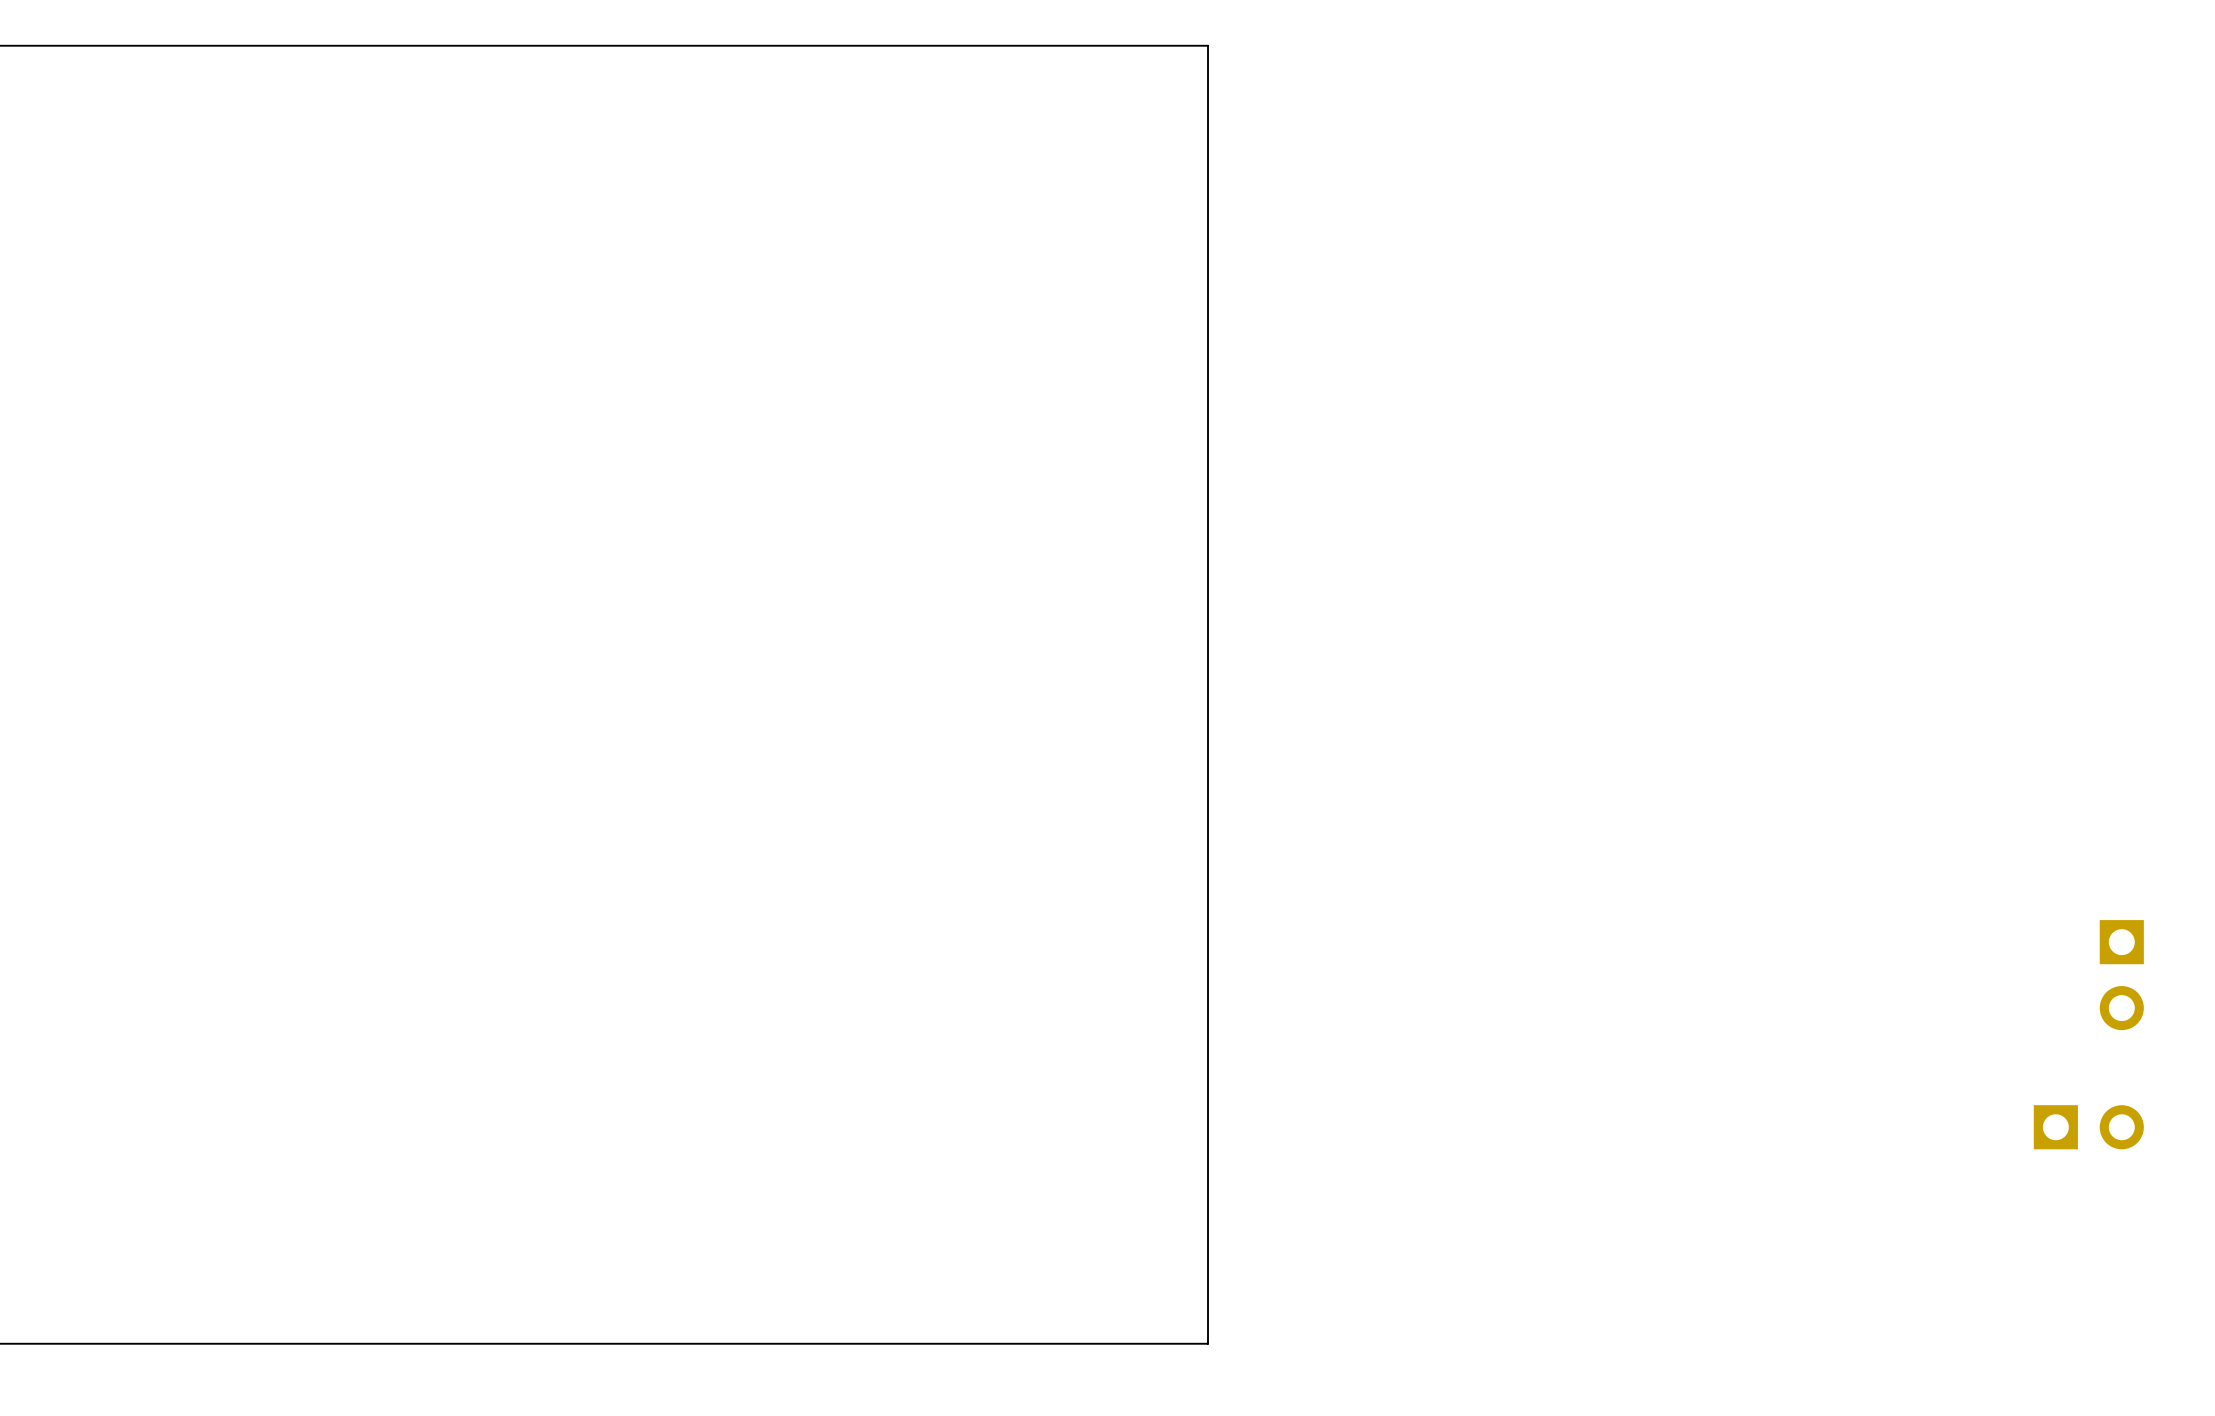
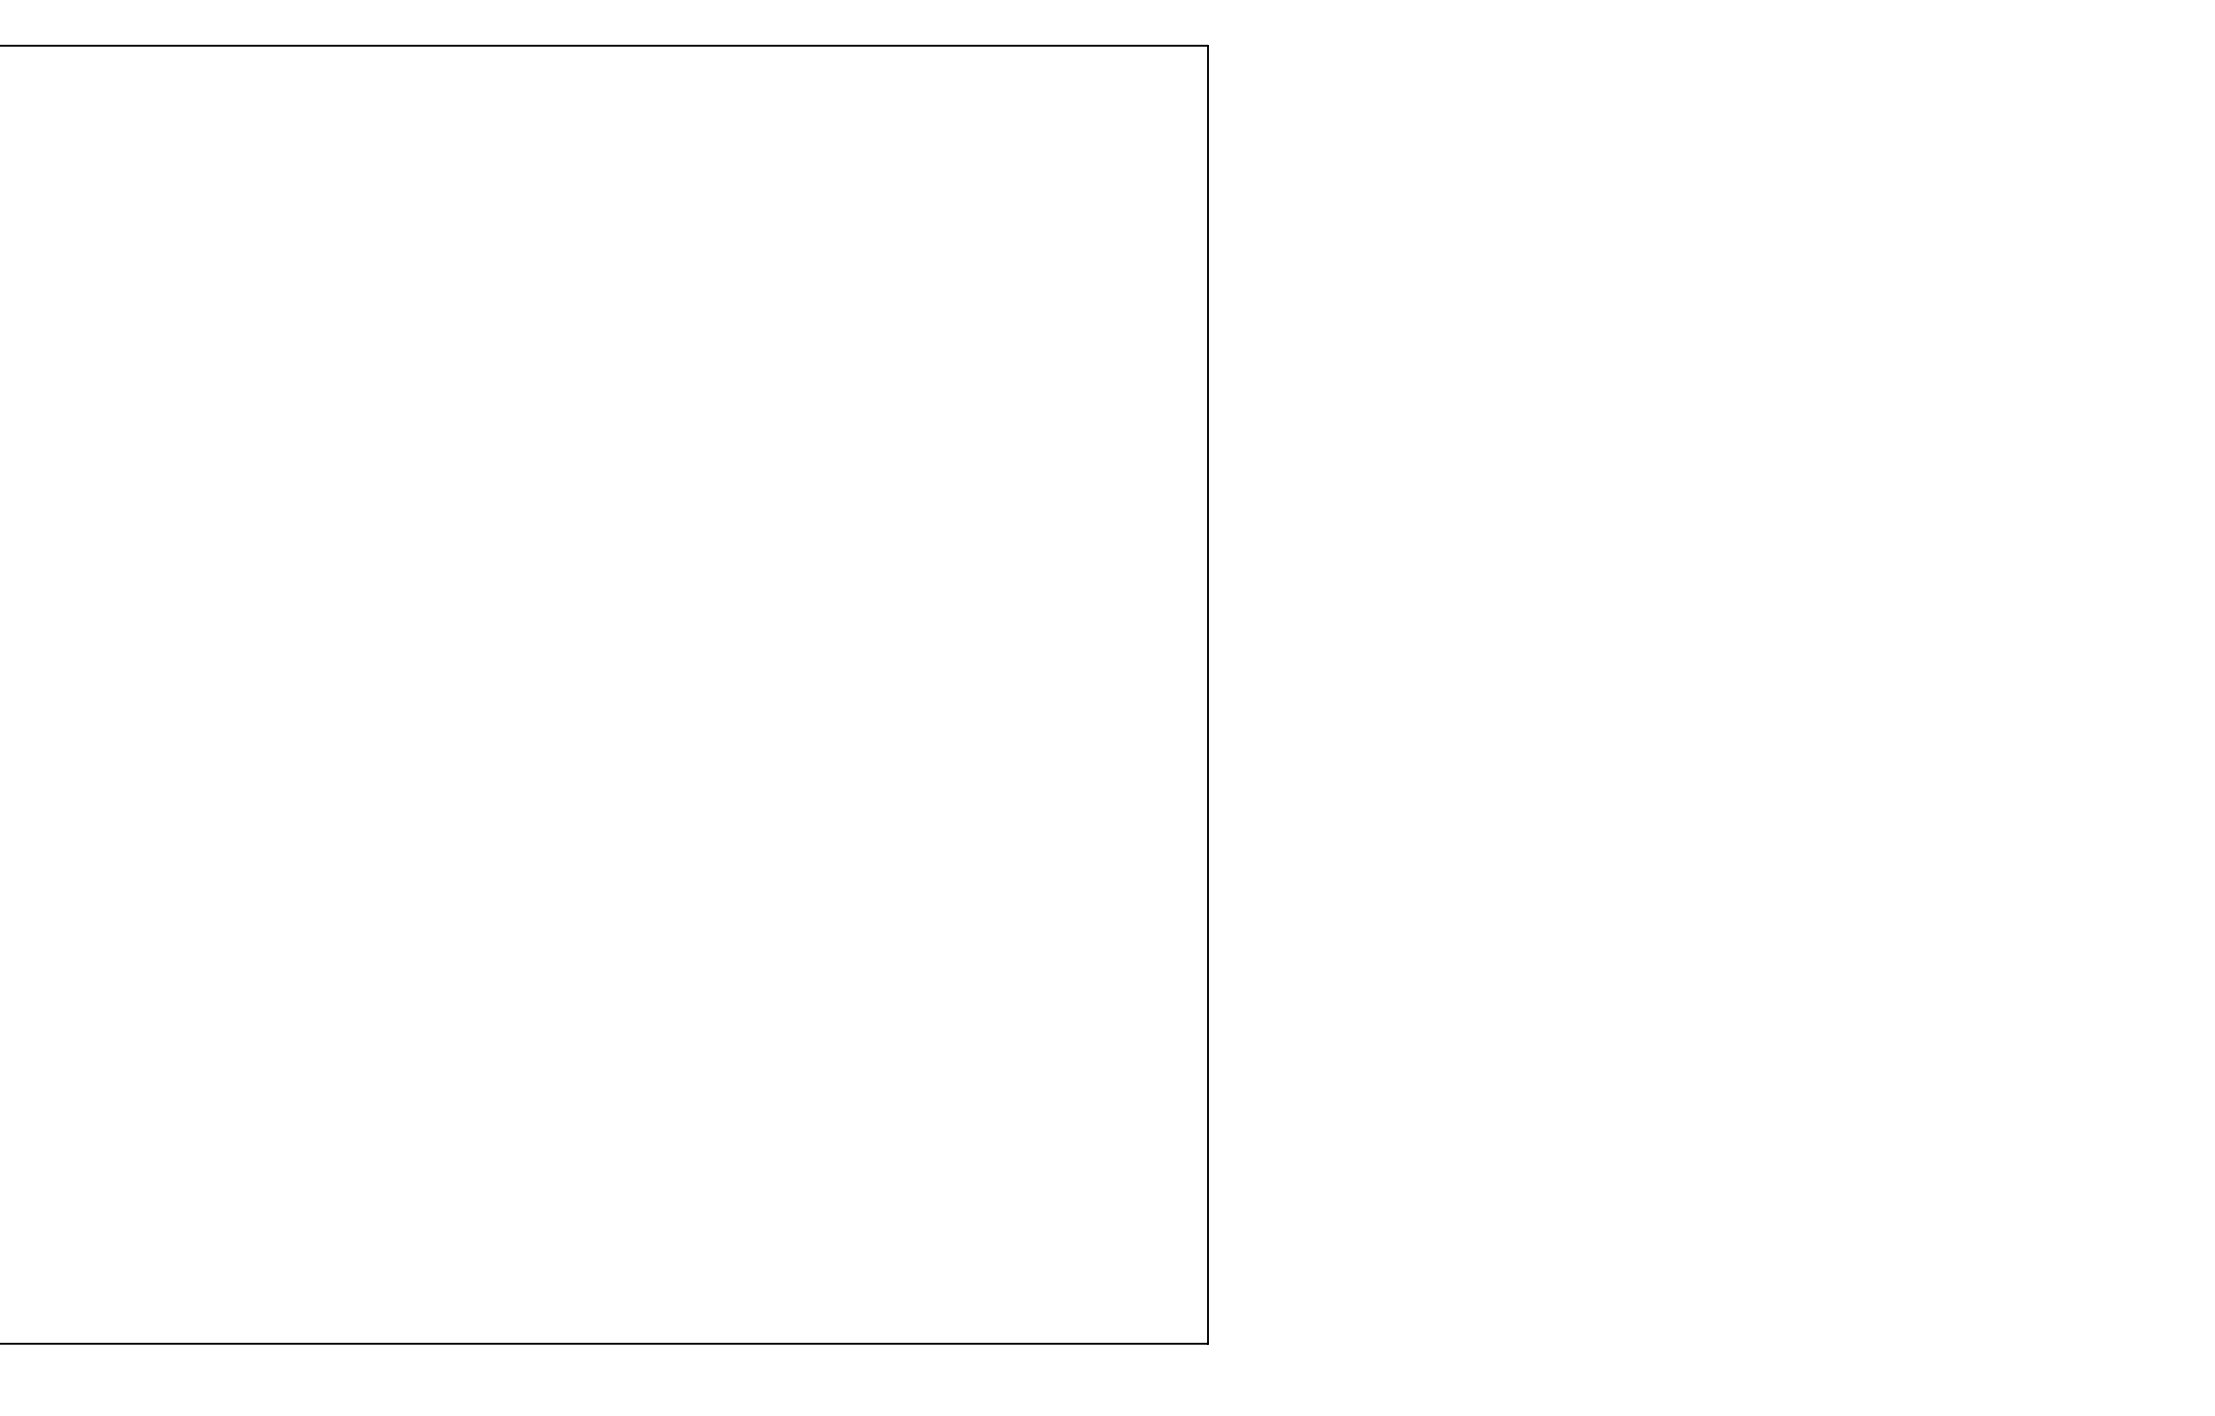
part: (2121, 975) -> none
part: (2088, 1127) -> none

